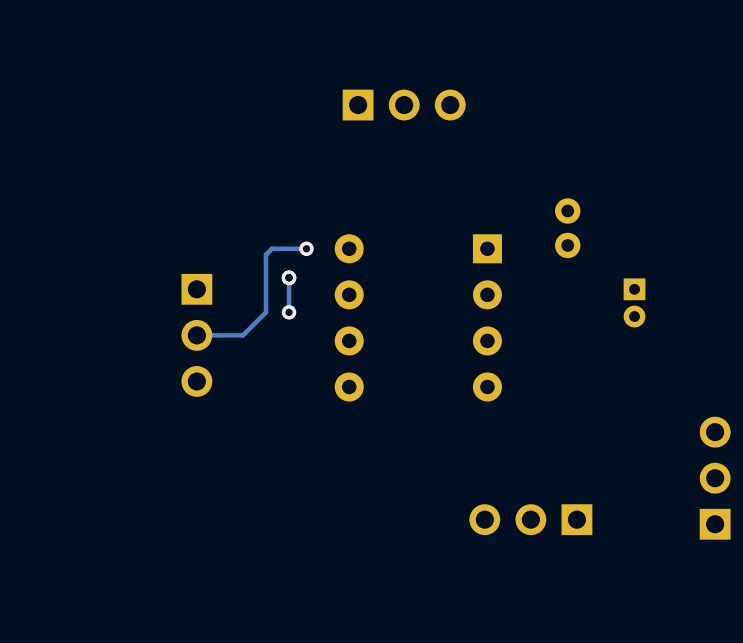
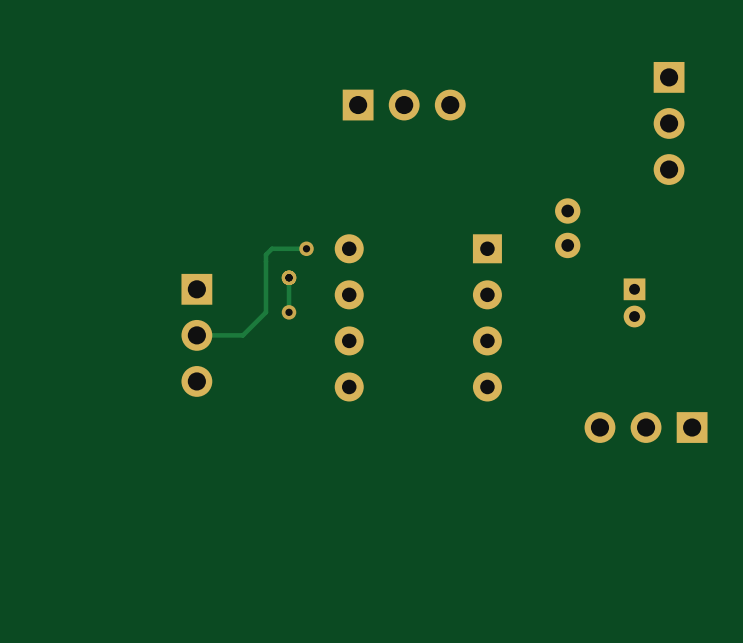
part: none -> (669, 123)
part: none -> (646, 427)
part: (715, 478) -> none
part: (530, 519) -> none

